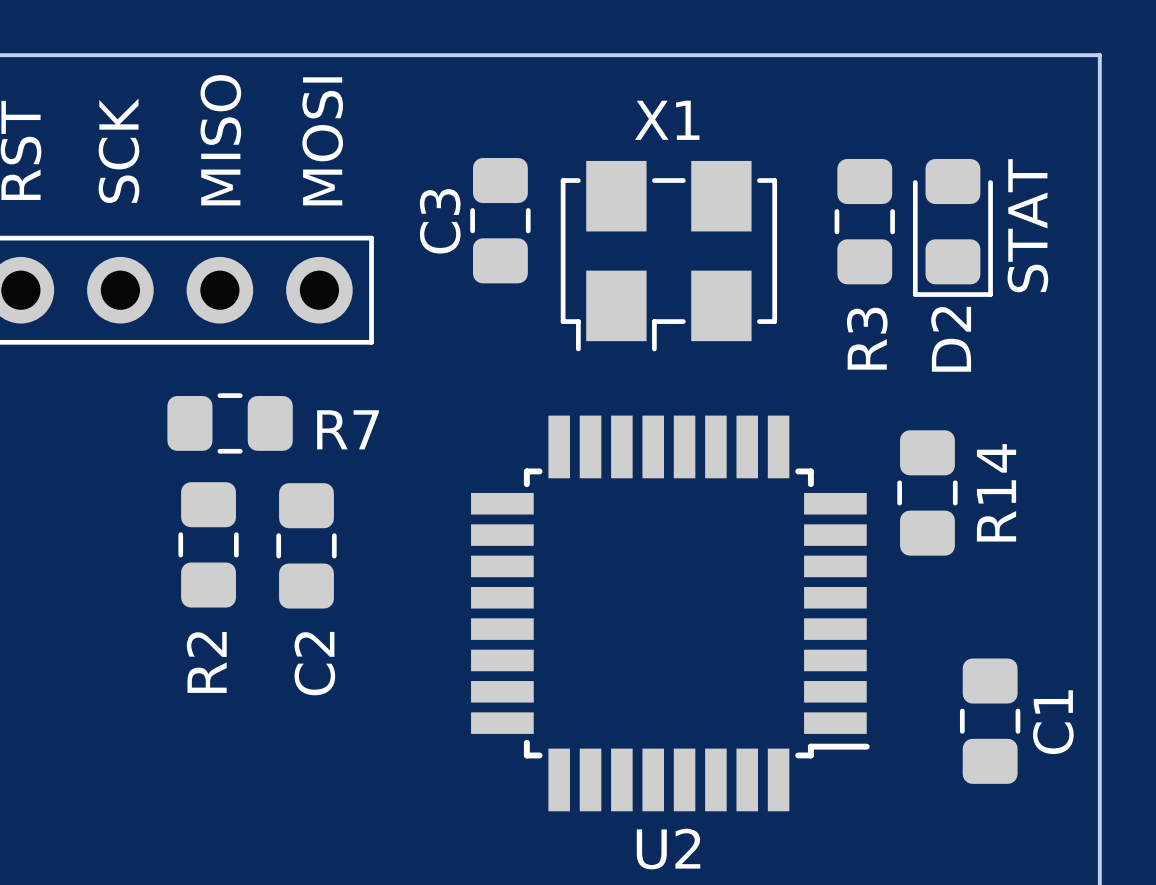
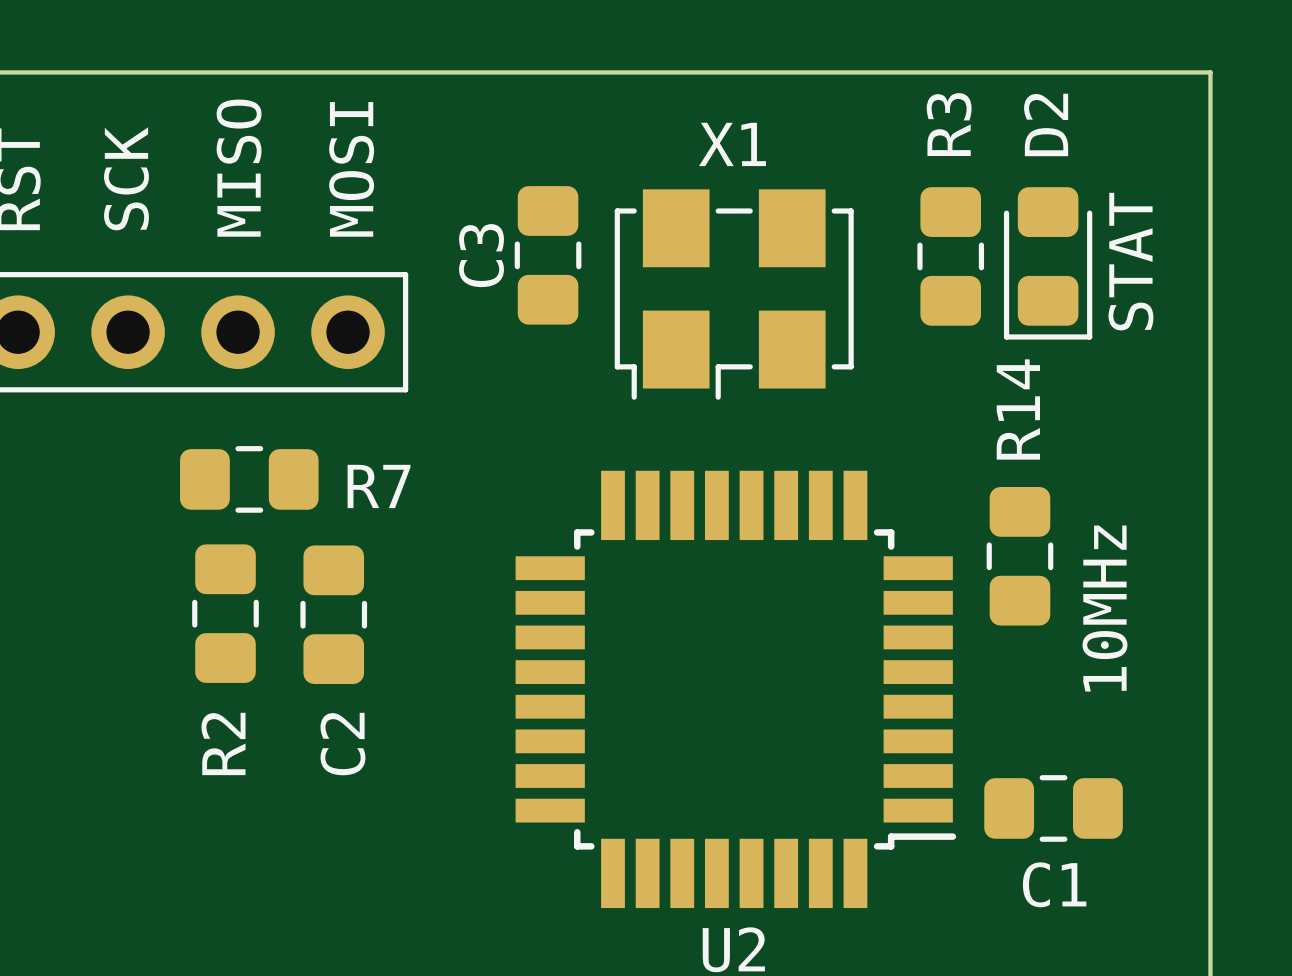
R3 name position: R3 (867, 338) -> R3 (949, 124)
D2 name position: D2 (951, 339) -> D2 (1046, 124)
R14 name position: R14 (996, 492) -> R14 (1018, 409)
text: none -> 10MHz (1104, 608)
C1 rotation: 0° (990, 721) -> 90° clockwise (1053, 808)

